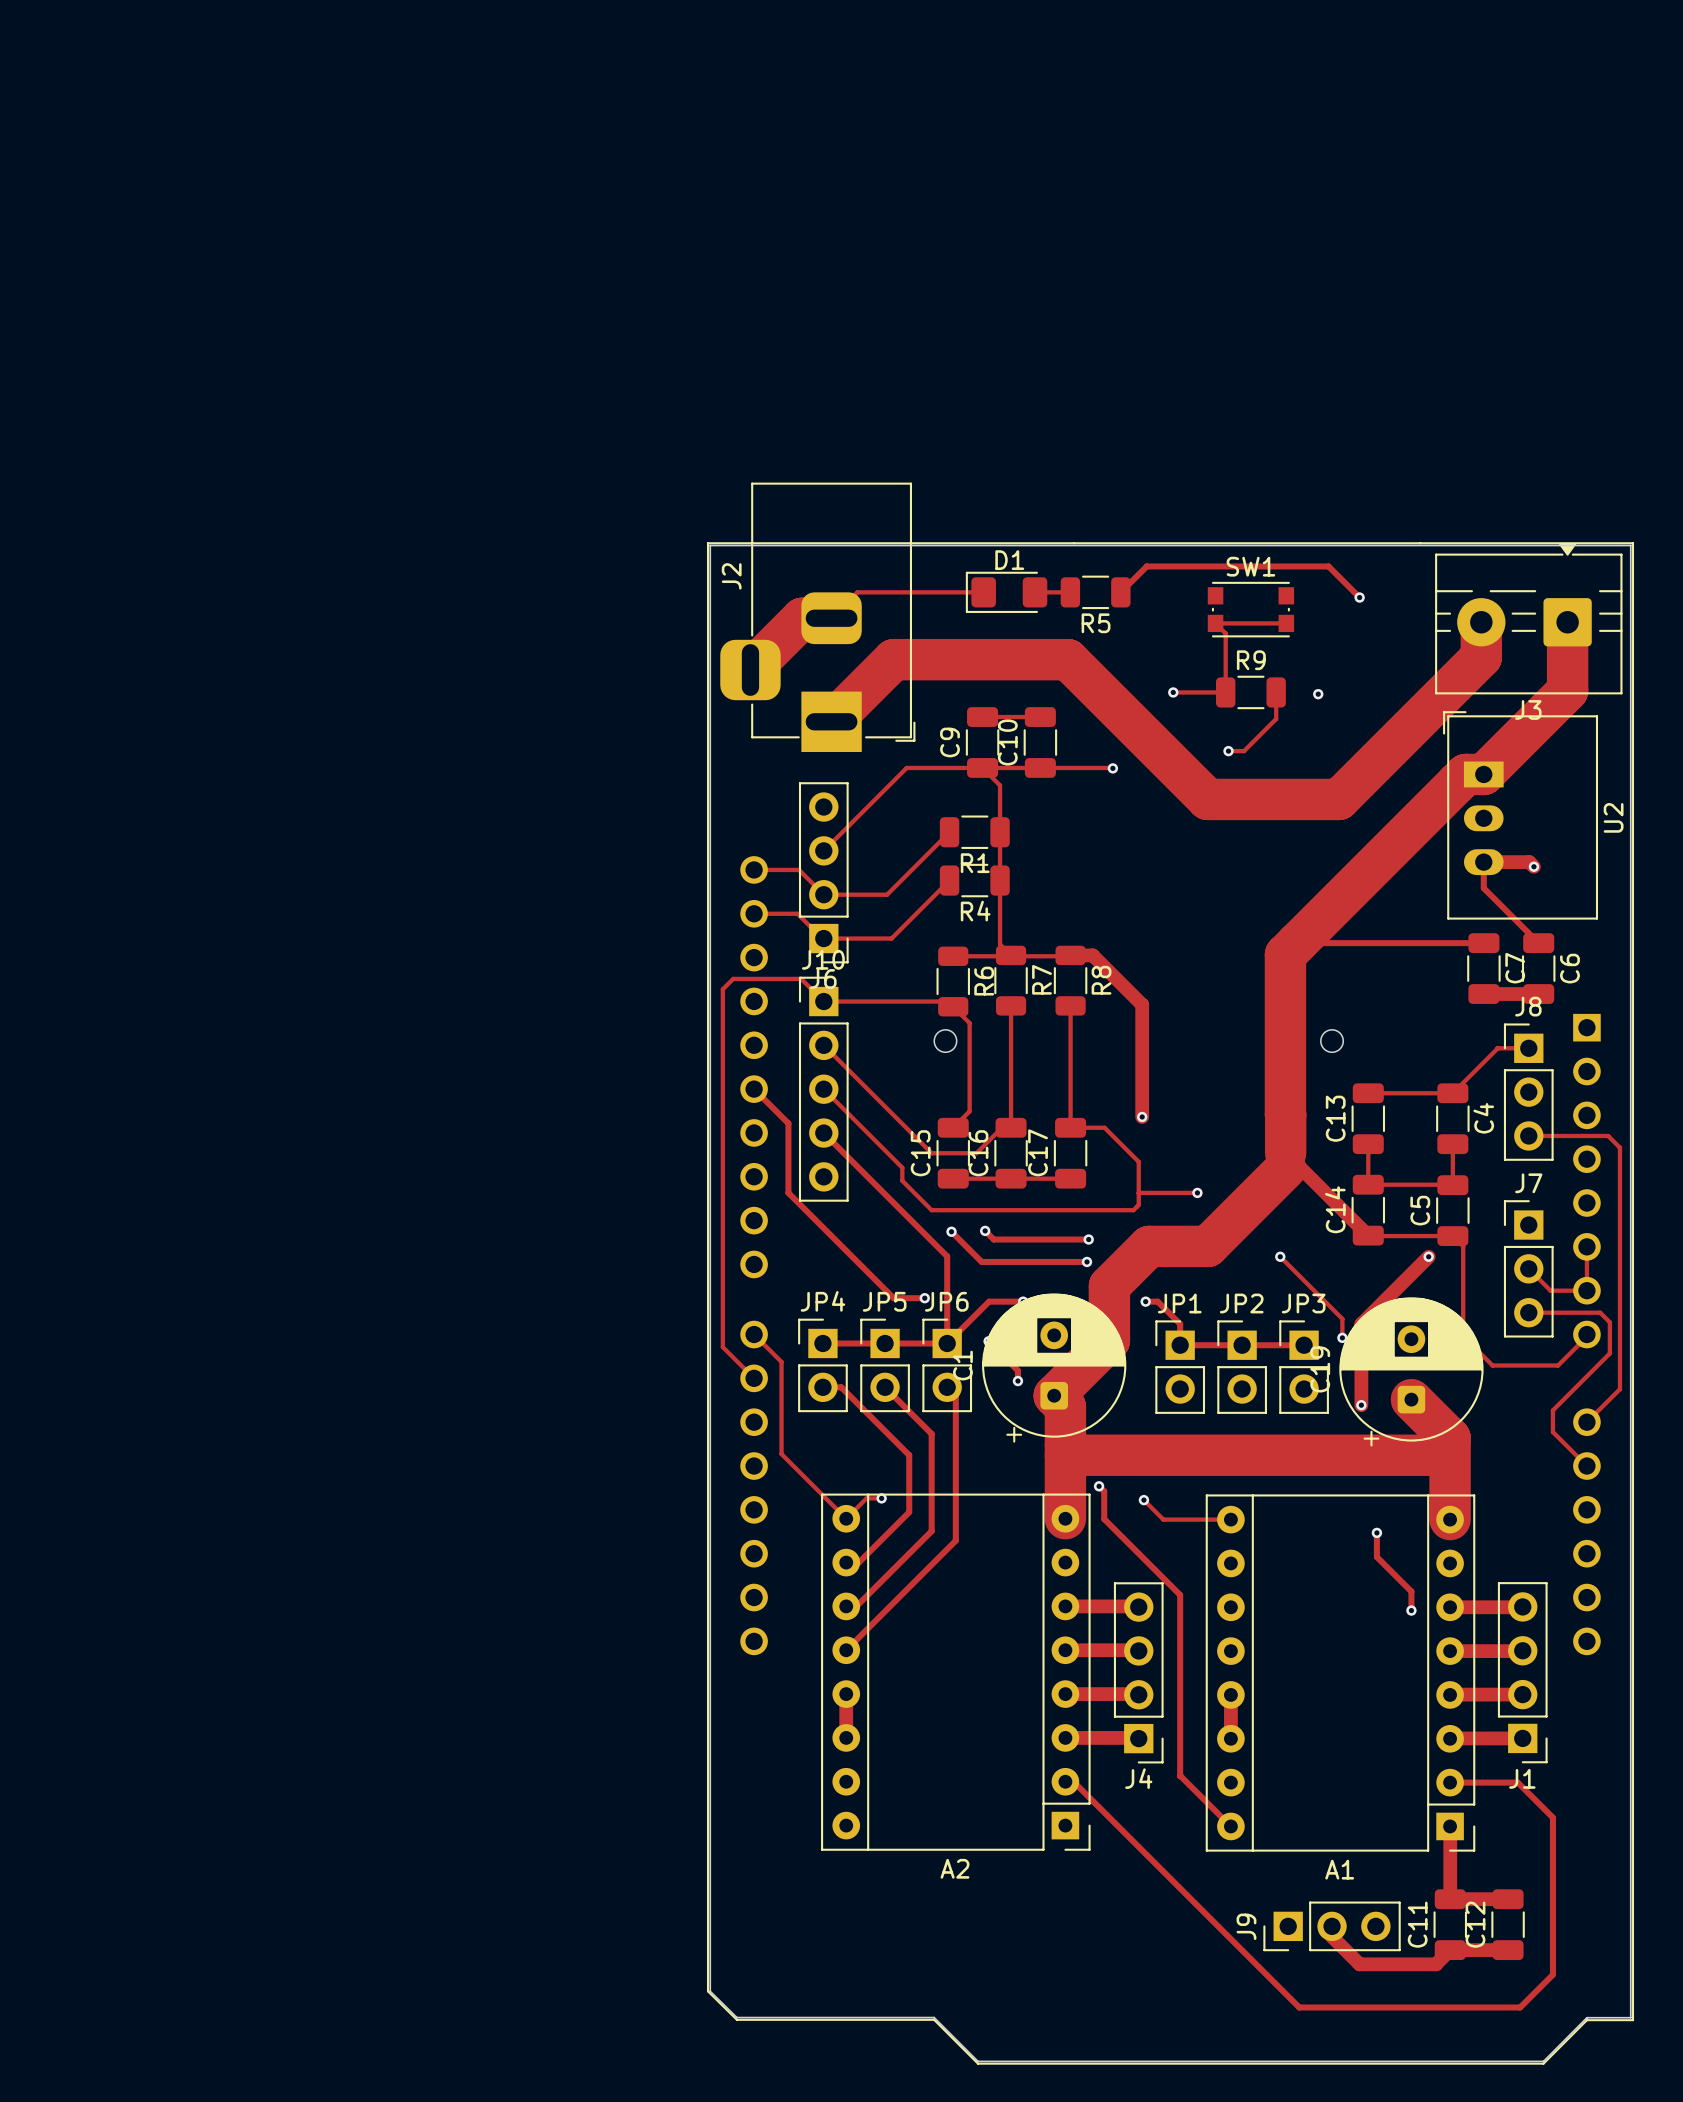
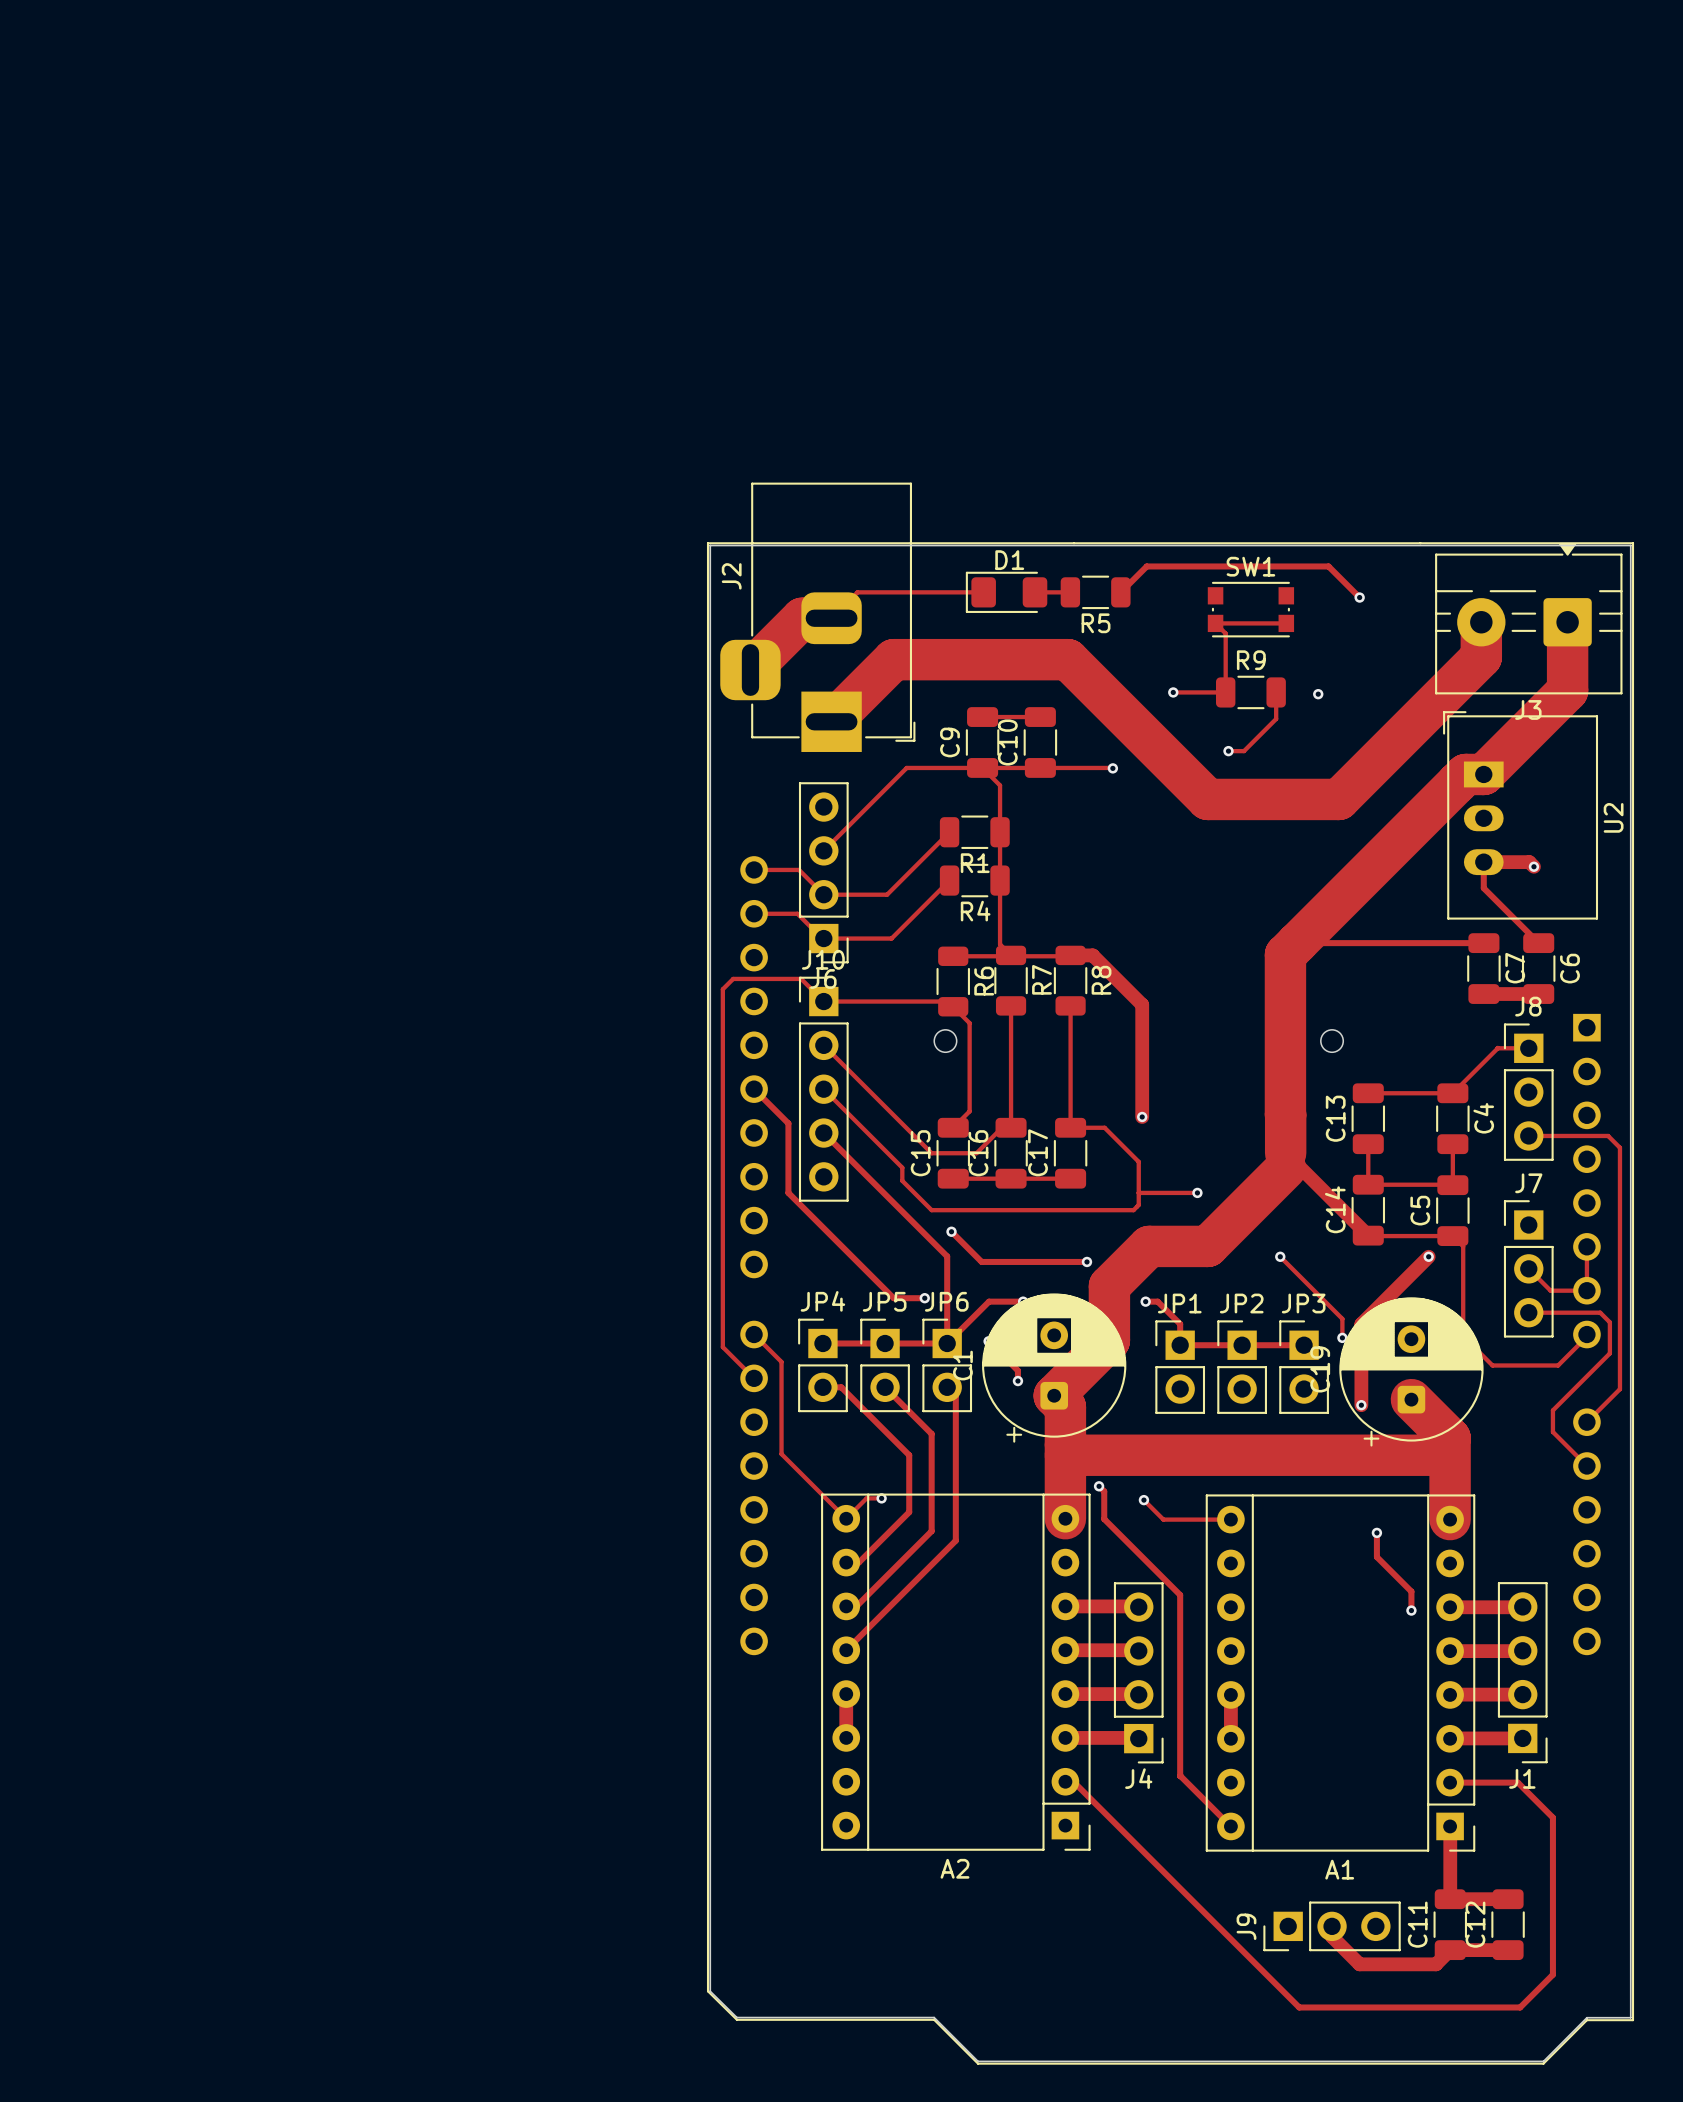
track: (985, 1230) (993, 1239) (1088, 1239) -> none
via: (985, 1230) -> none
via: (1088, 1239) -> none

